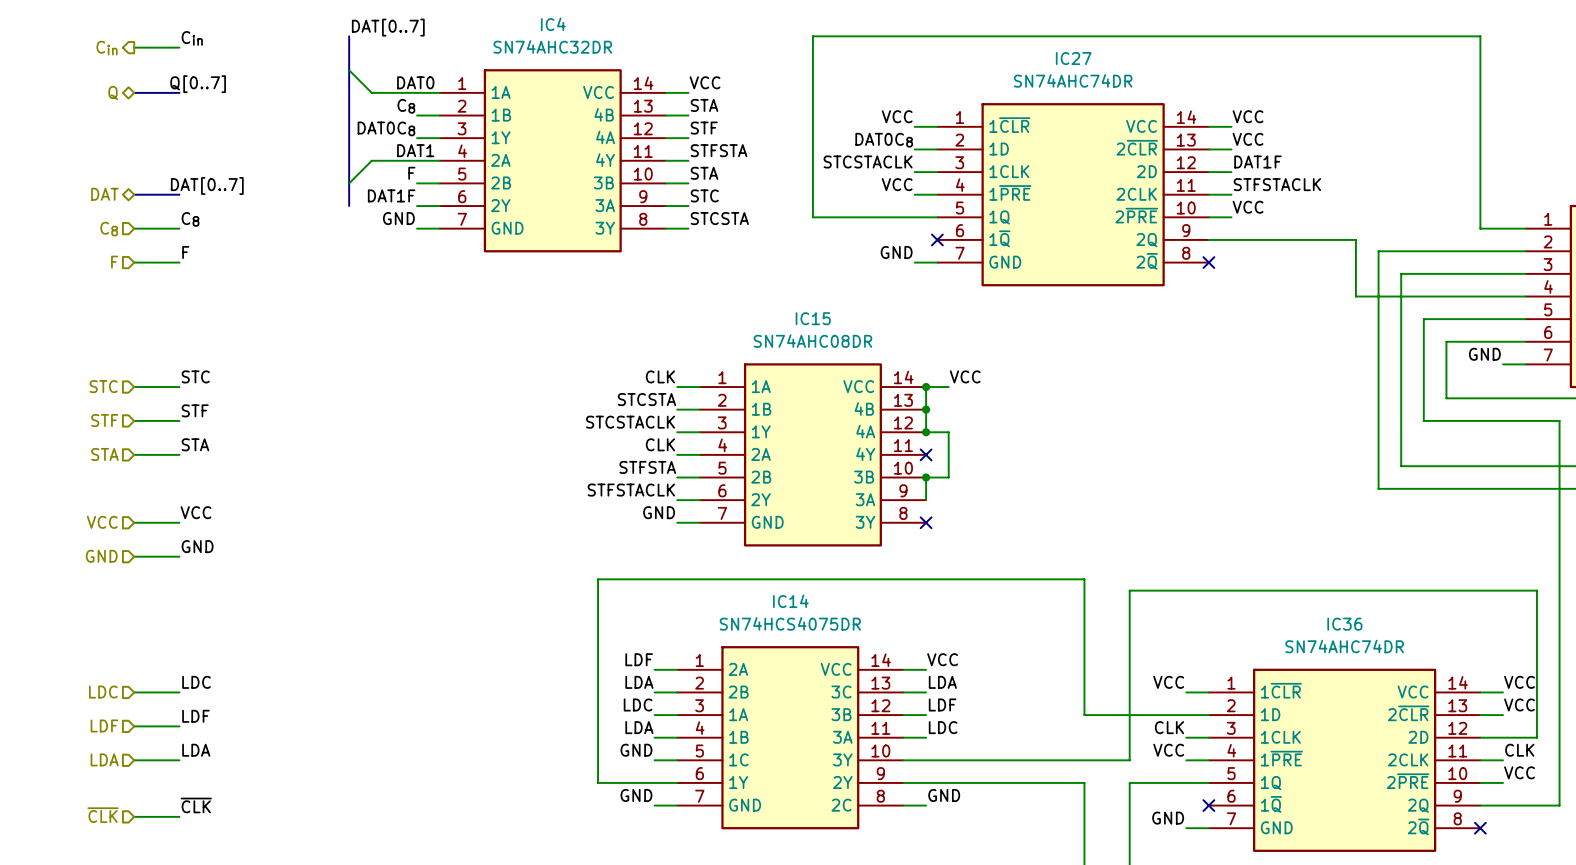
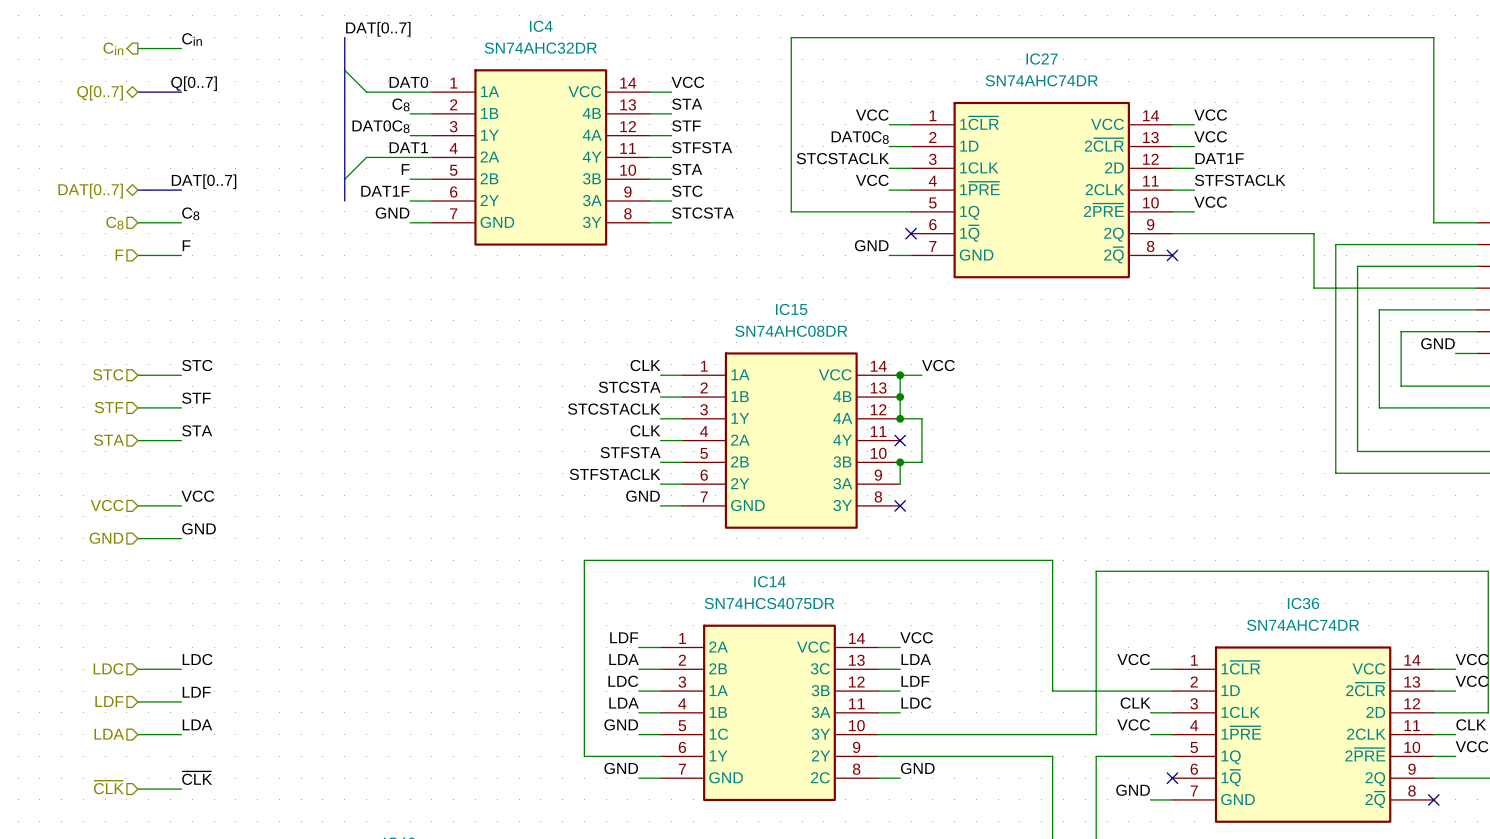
hierarchical label: Q (113, 93) -> Q[0..7] (100, 93)
hierarchical label: DAT (104, 194) -> DAT[0..7] (90, 191)

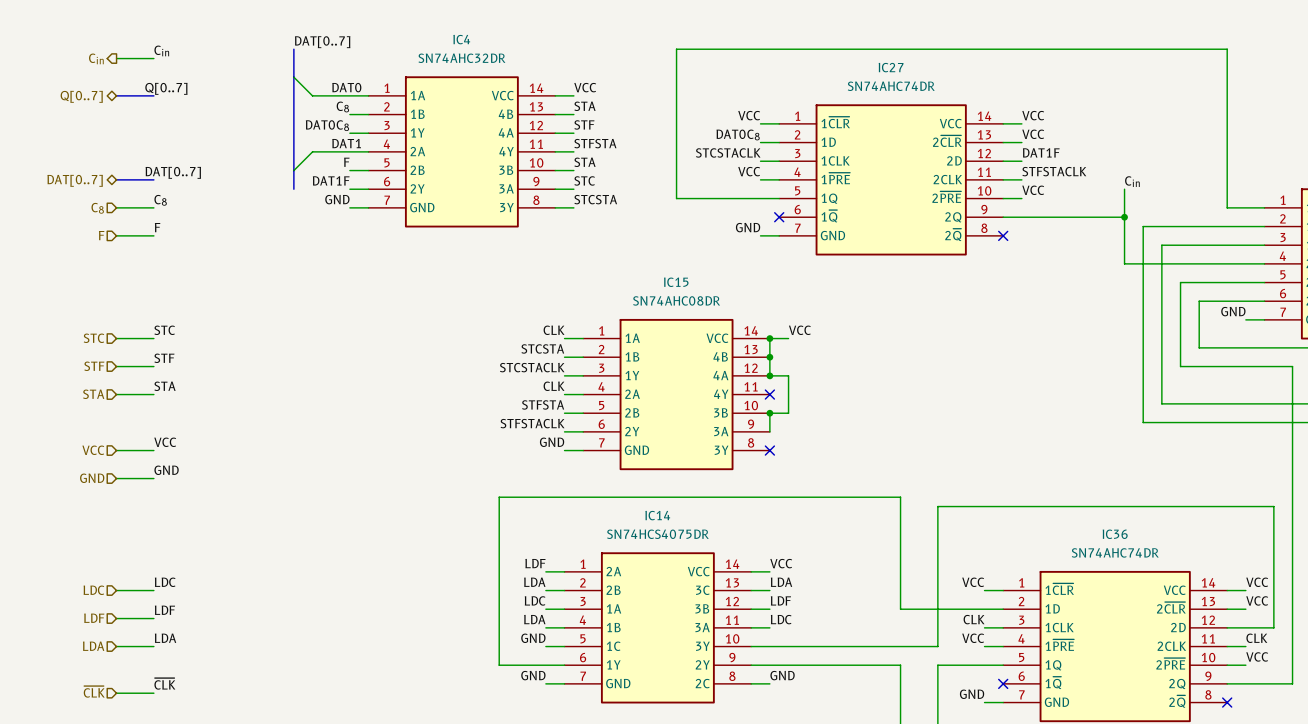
label: none -> Cin (1132, 181)
wire: none -> (1124, 189) (1124, 217)
junction: none -> (1124, 217)

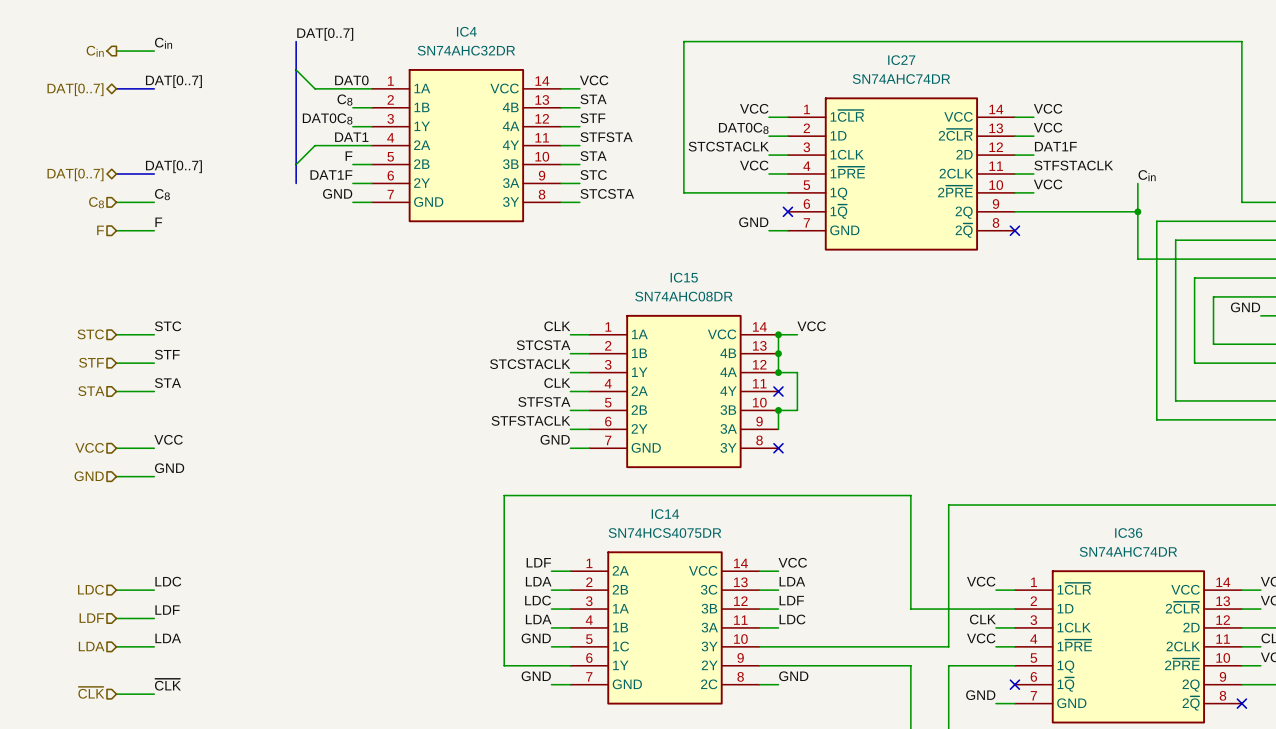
label: Q[0..7] (166, 88) -> DAT[0..7] (173, 81)
hierarchical label: Q[0..7] (81, 96) -> DAT[0..7] (75, 89)

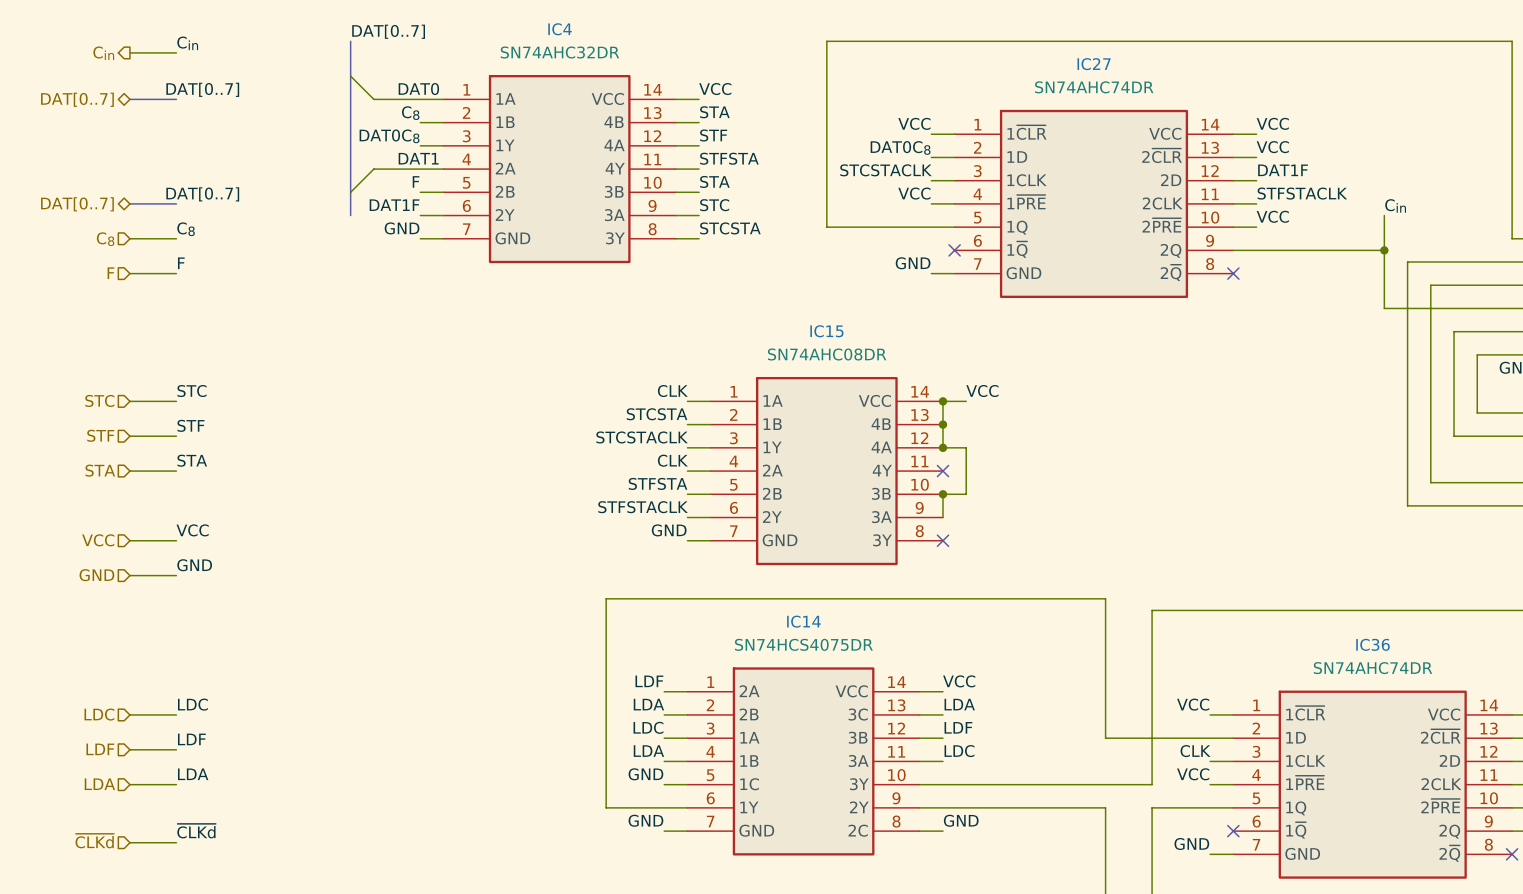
label: ~{CLK} (167, 684) -> ~{CLKd} (196, 831)
hierarchical label: ~{CLK} (91, 692) -> ~{CLKd} (94, 841)

